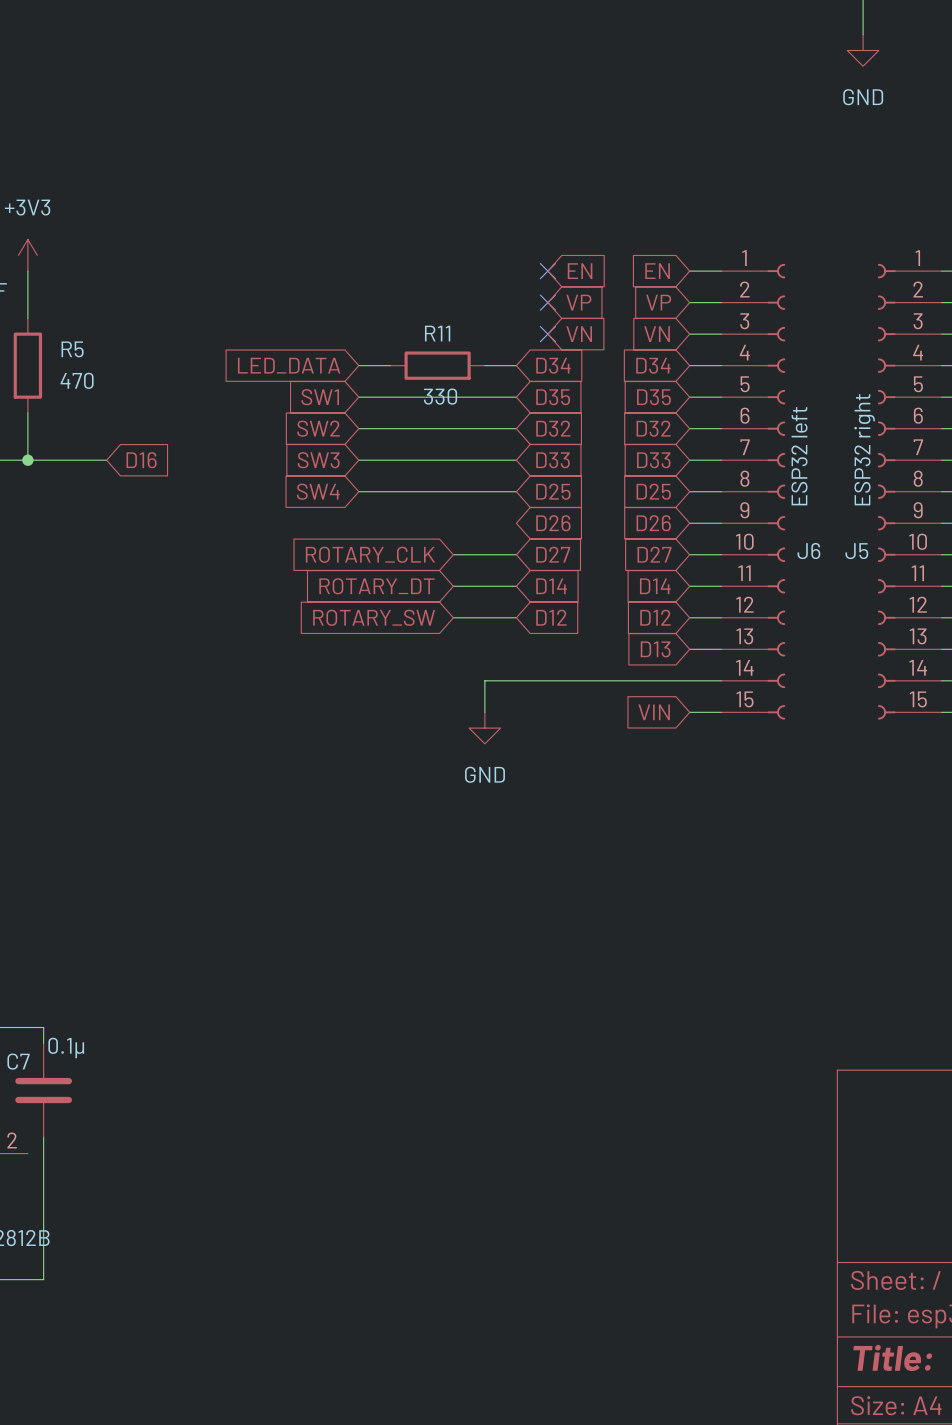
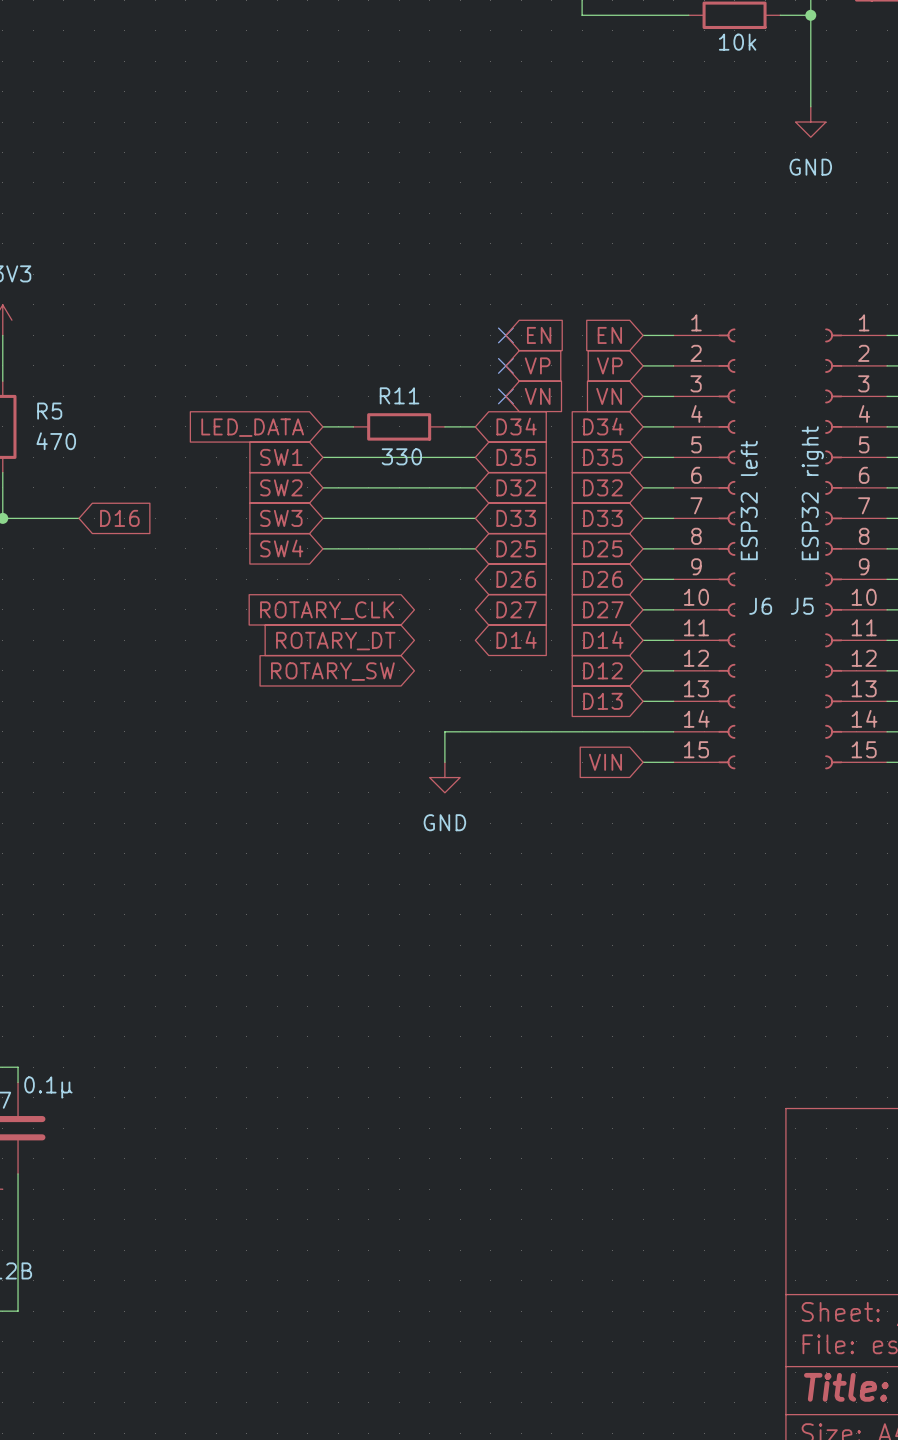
wire: (453, 554) (516, 554) -> none
wire: (453, 586) (516, 586) -> none
wire: (453, 617) (516, 617) -> none
global label: D12 (551, 617) -> none

